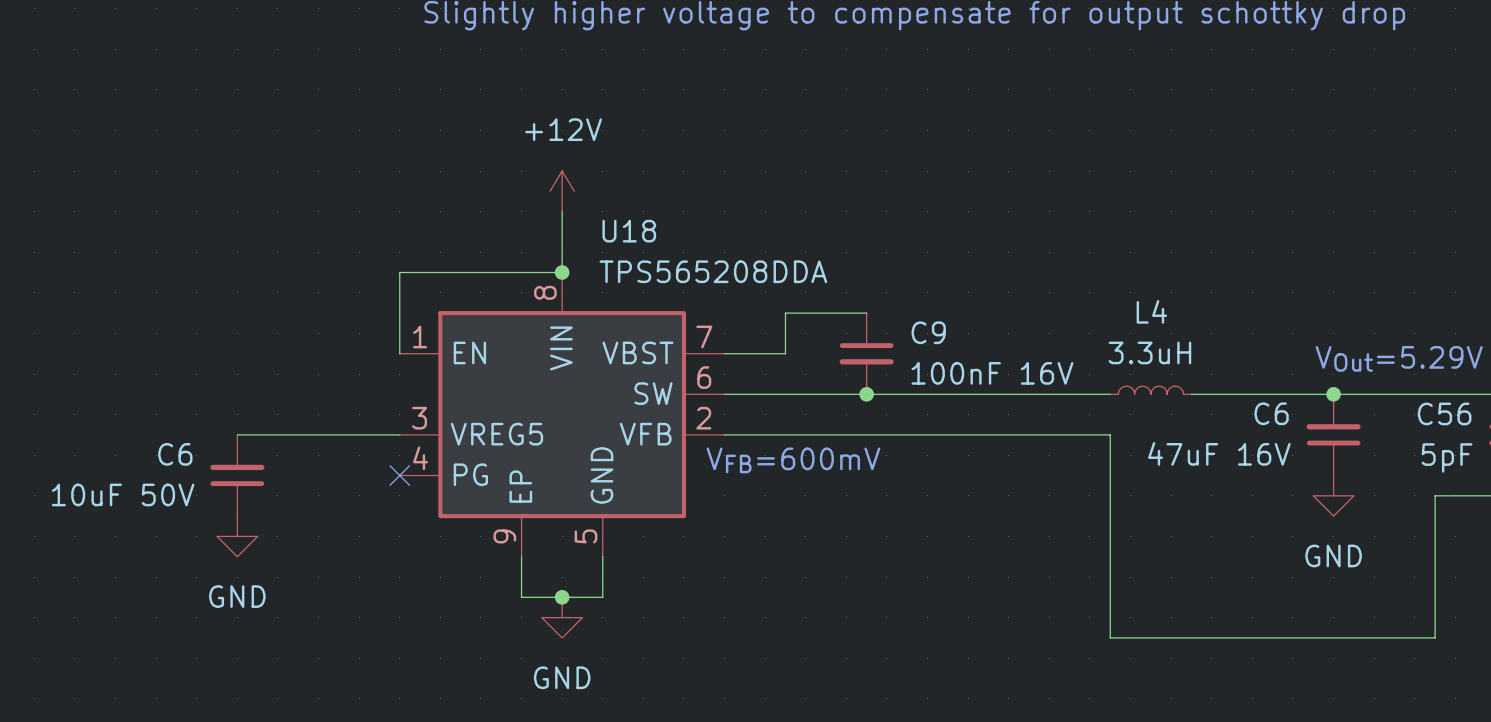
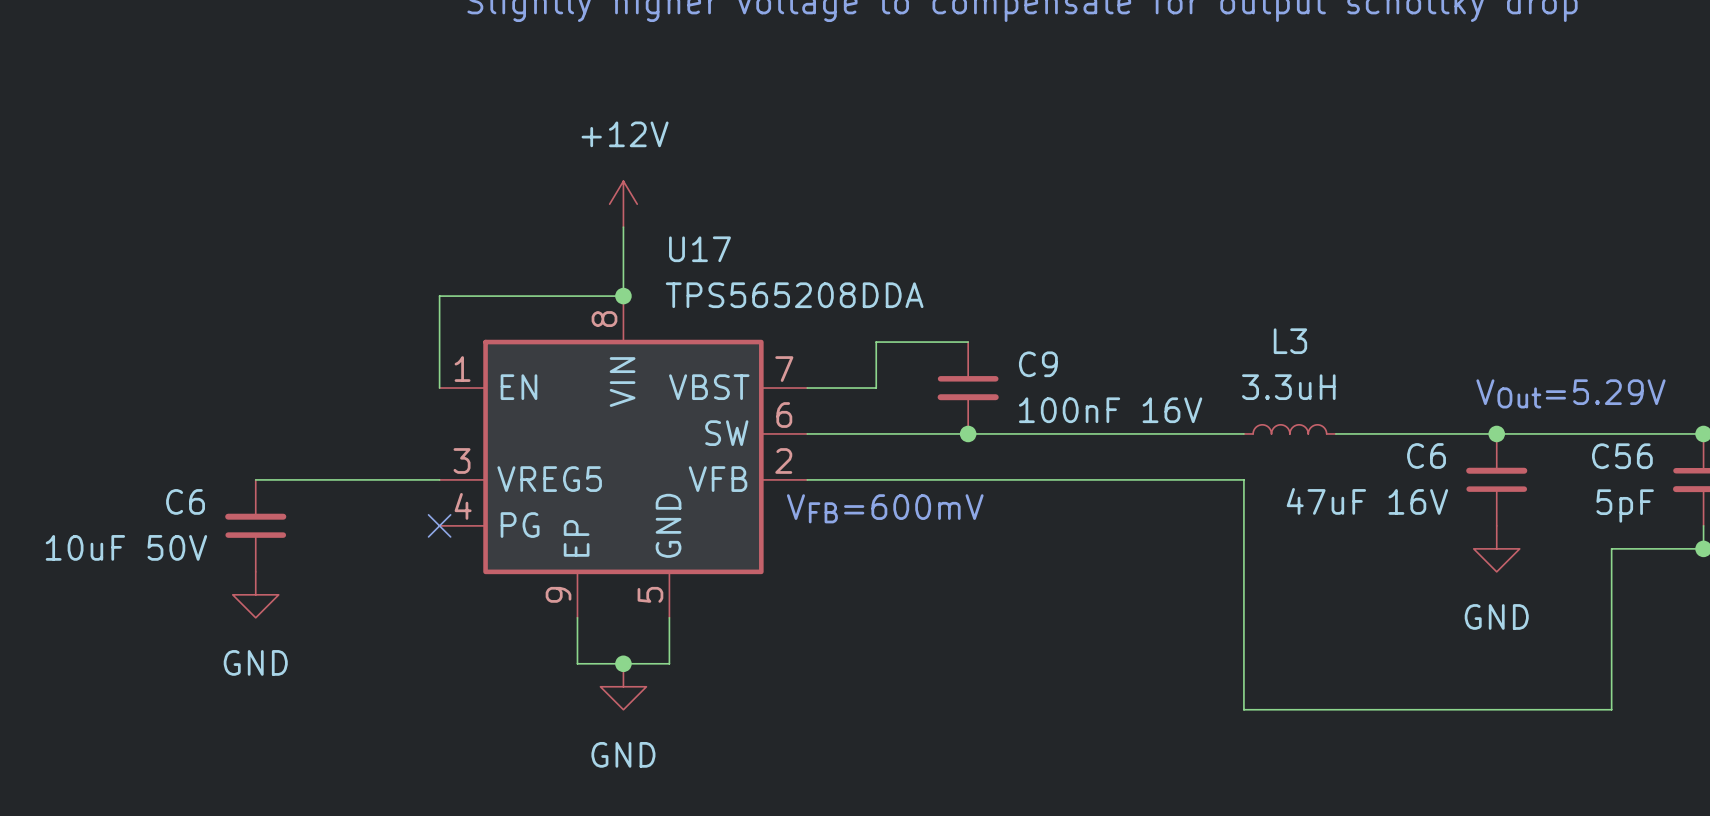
U18 name: U18 (629, 231) -> U17 (699, 249)
L4 name: L4 (1151, 311) -> L3 (1290, 341)

